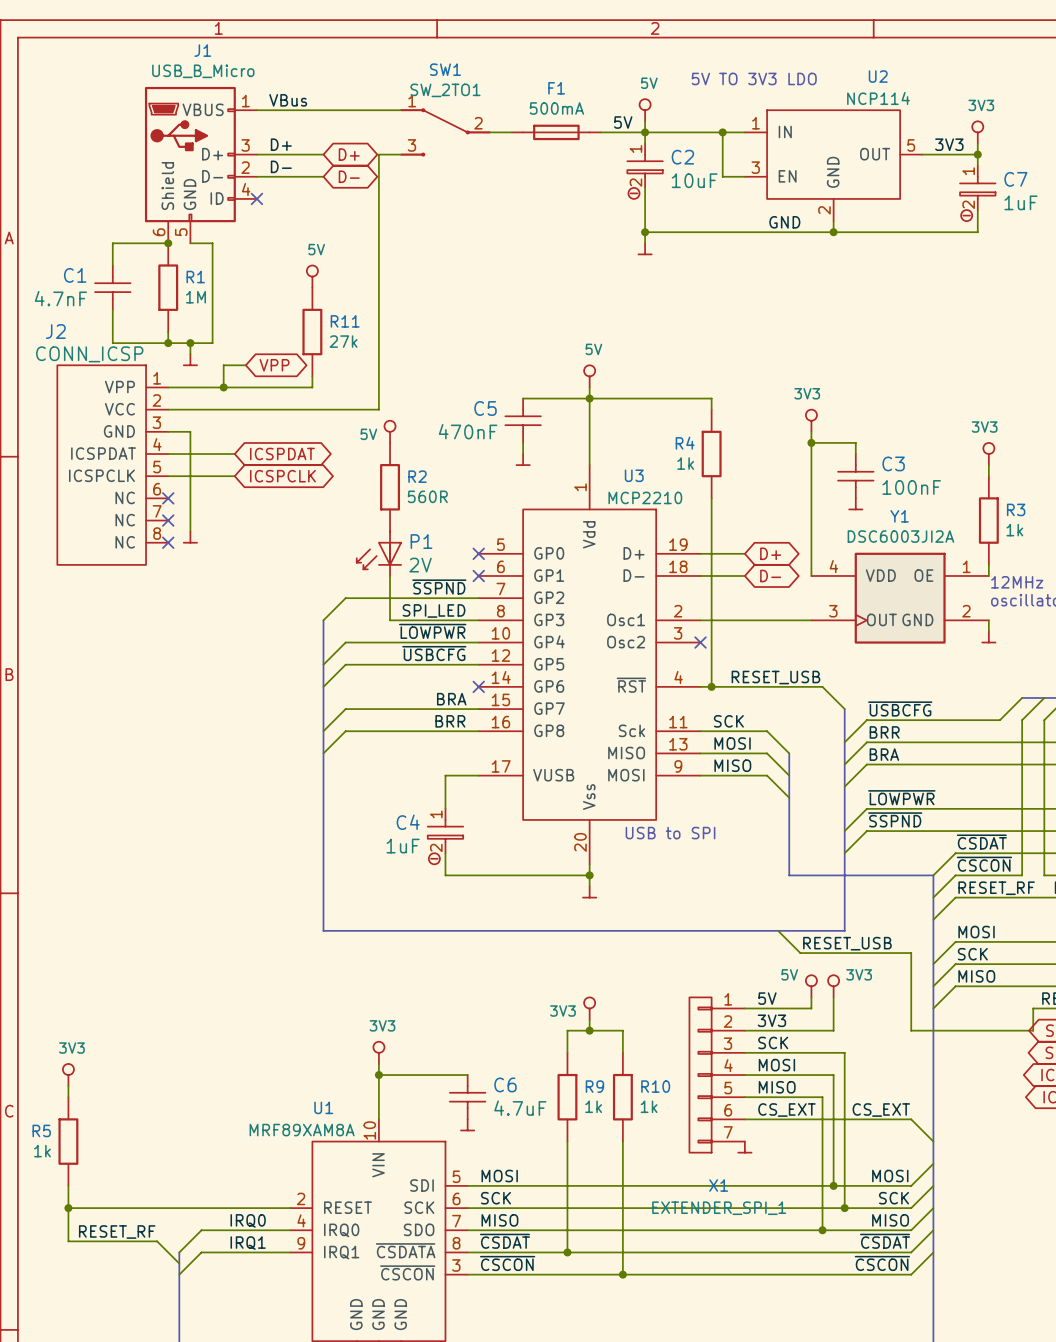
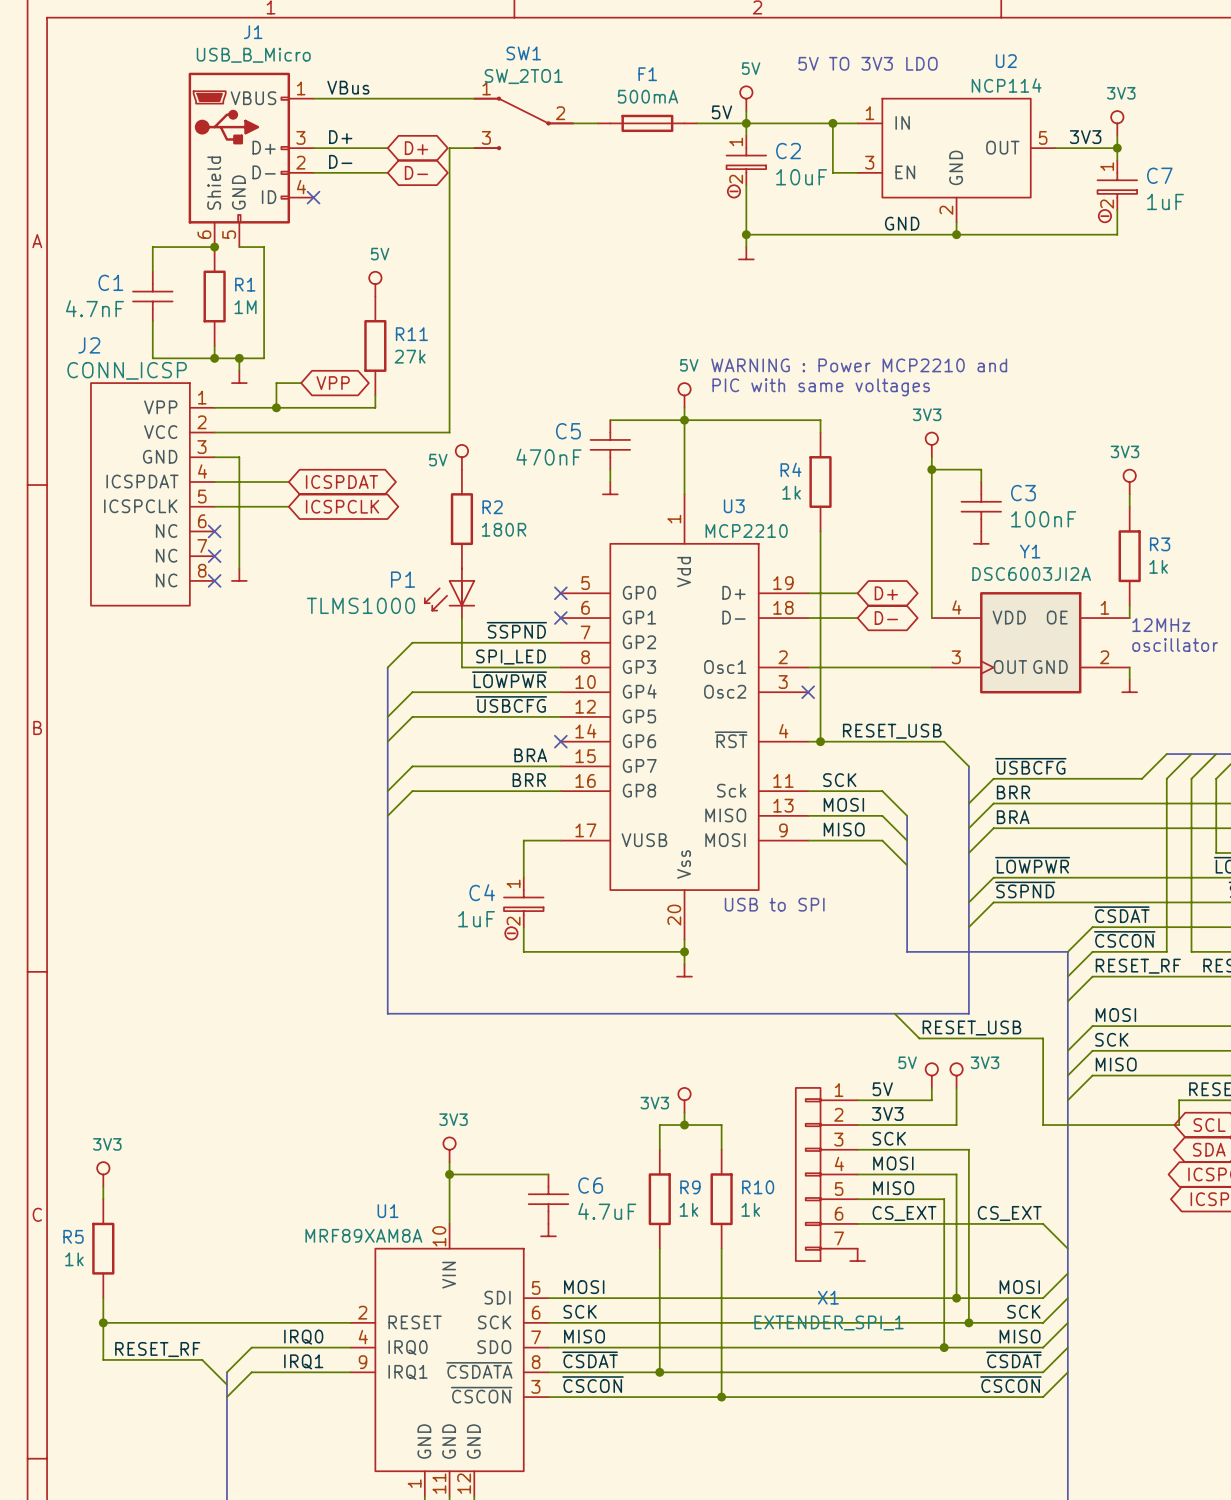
text: none -> WARNING : Power MCP2210 and (859, 365)
text: none -> PIC with same voltages (821, 387)
R2 value: 560R (427, 496) -> 180R (504, 529)
P1 name position: P1 (421, 541) -> P1 (403, 579)
P1 value: 2V (420, 565) -> TLMS1000 (361, 605)

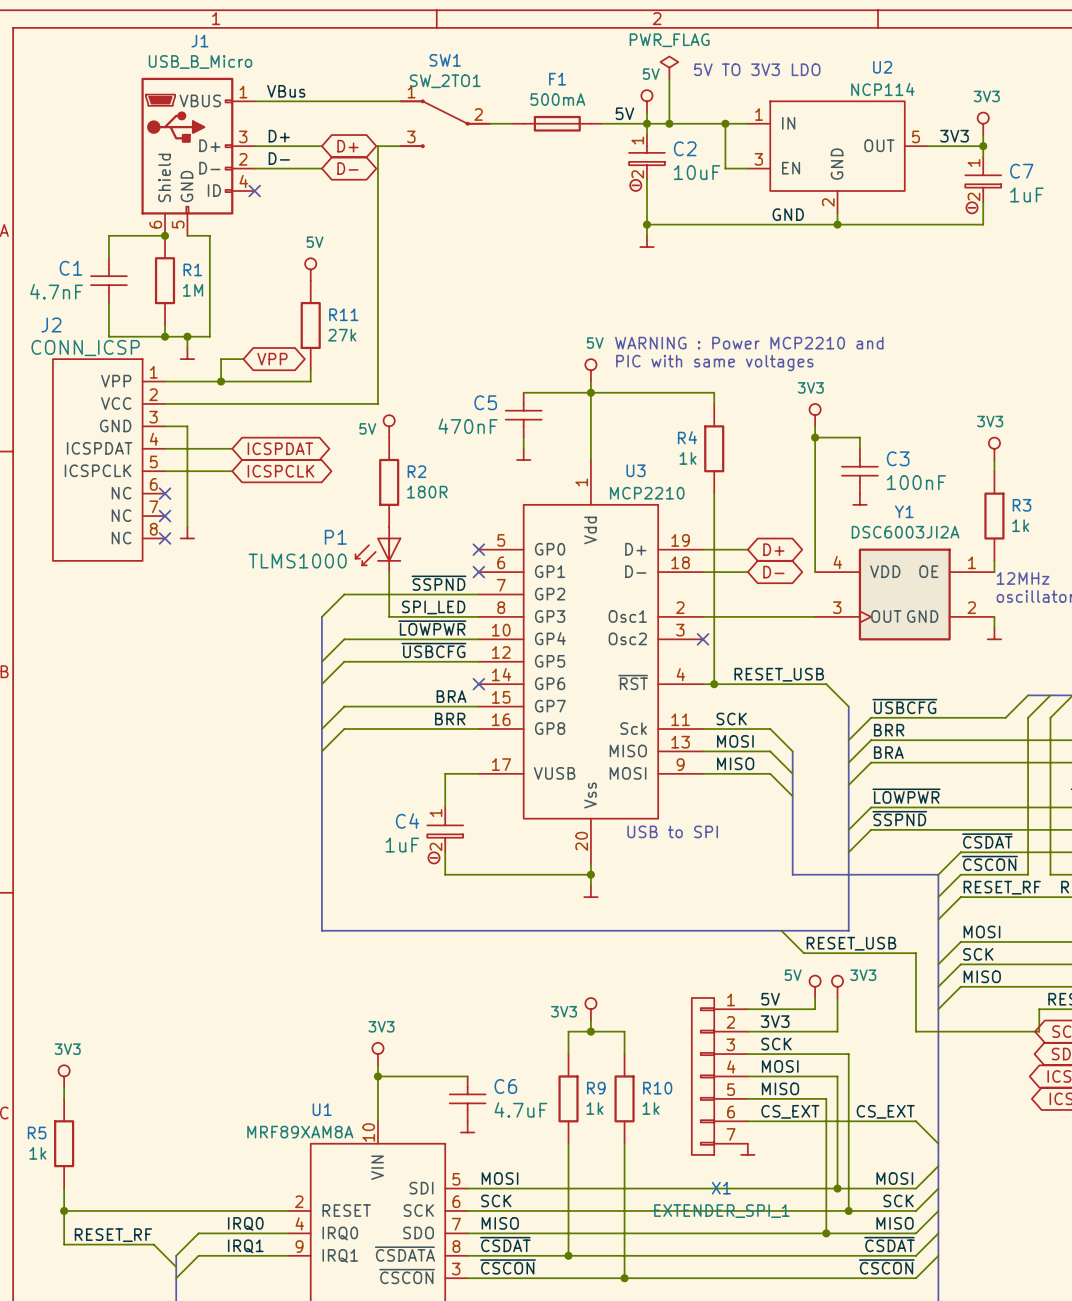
power symbol: none -> PWR_FLAG (669, 67)
wire: none -> (669, 78) (669, 123)
junction: none -> (669, 123)

